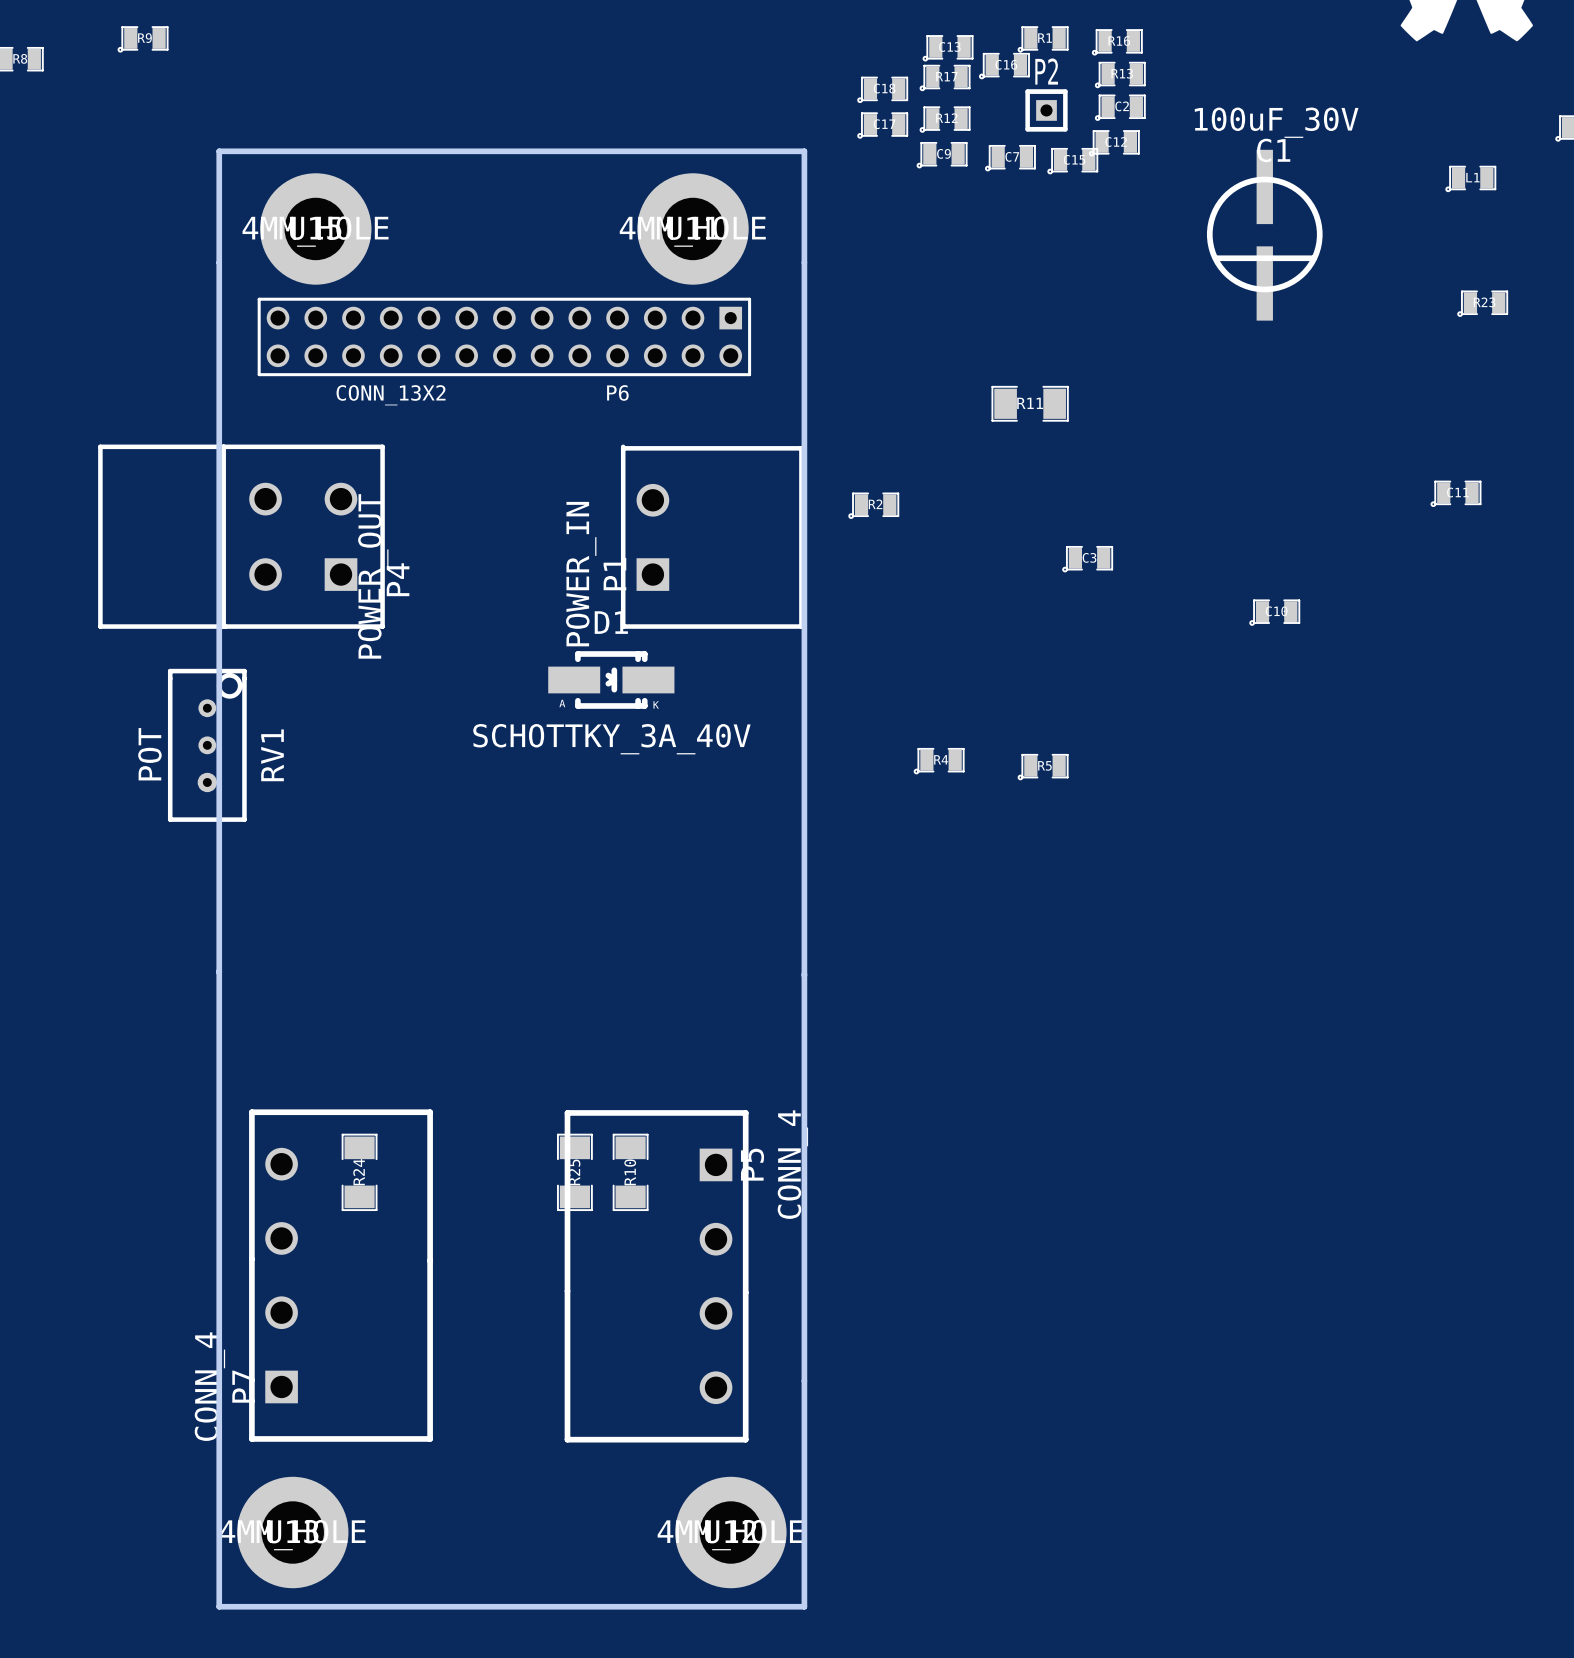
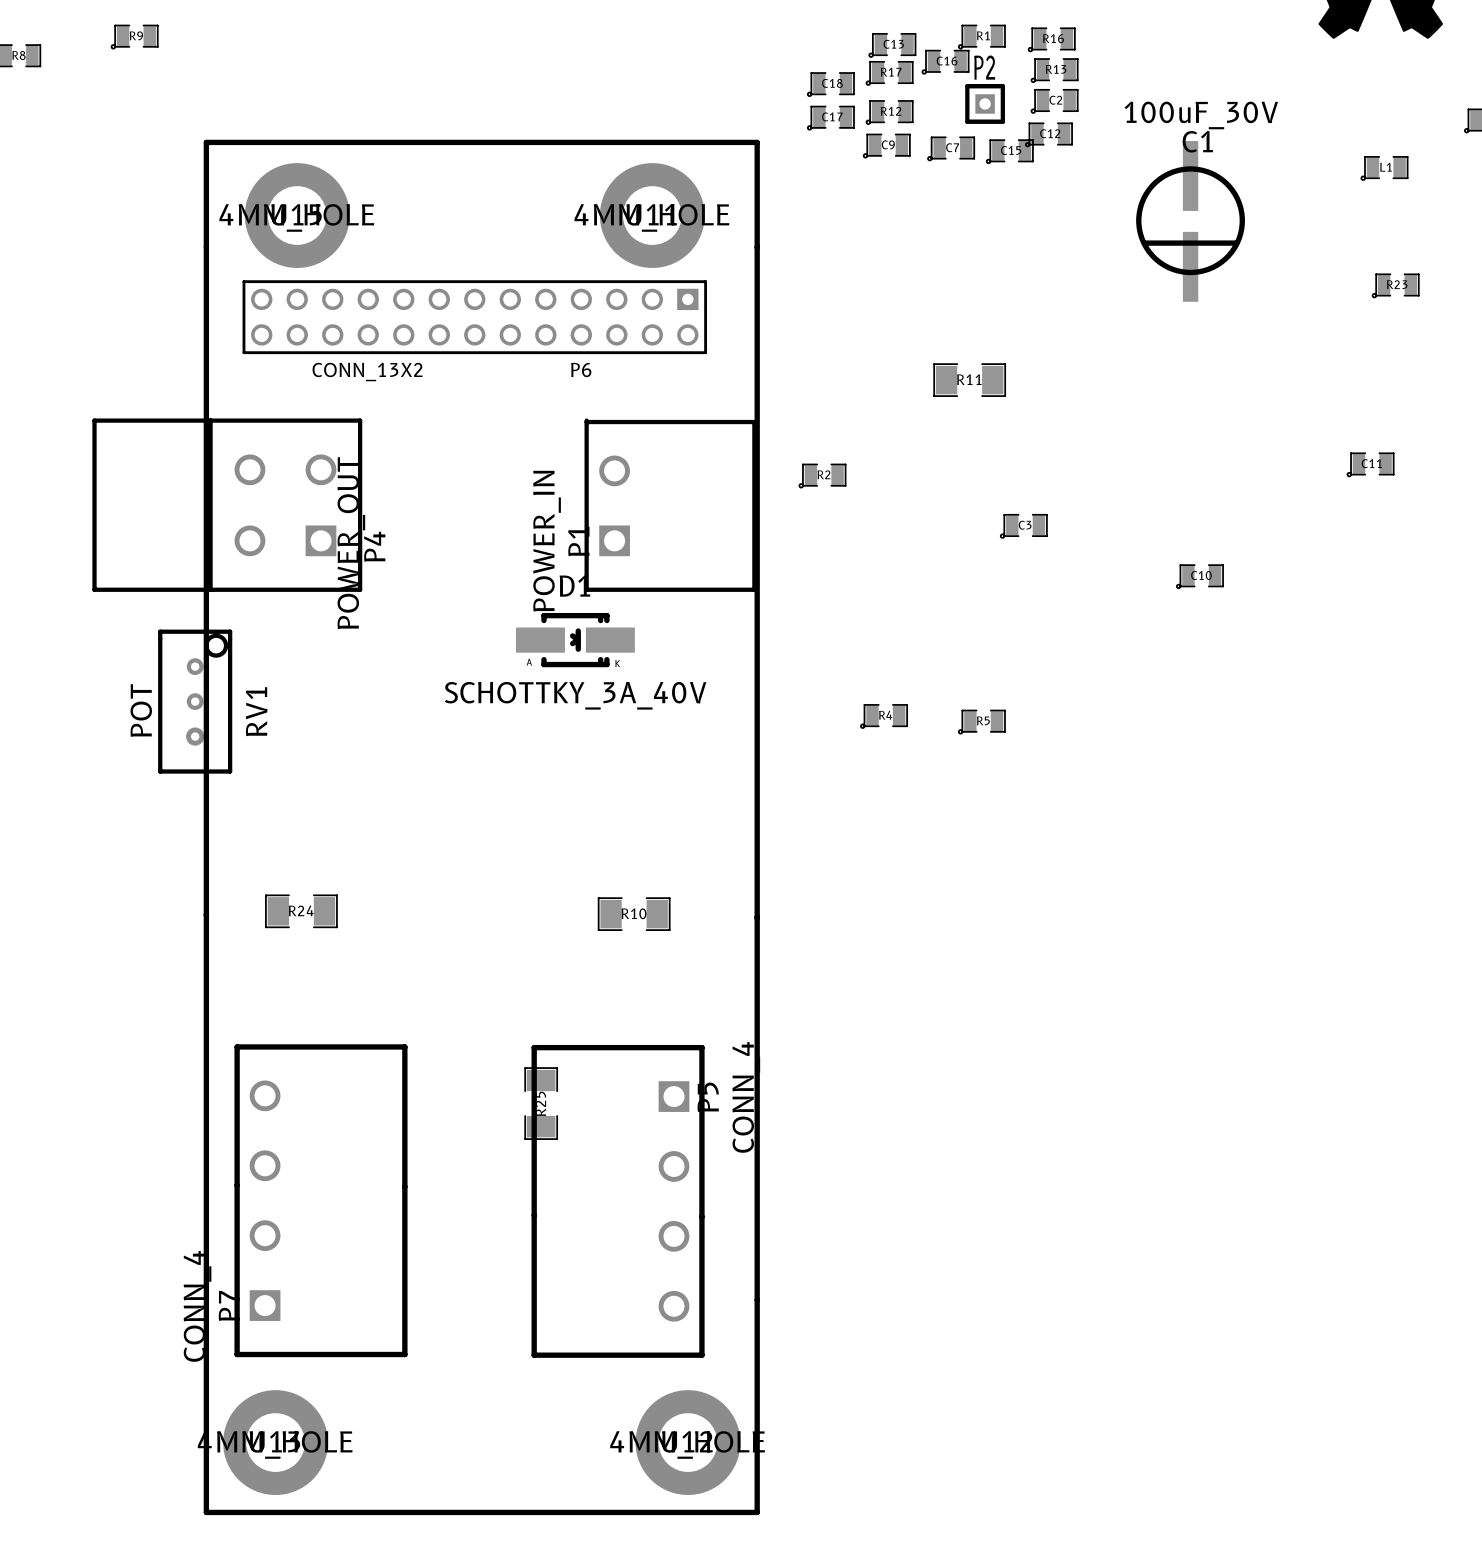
R24 rotation: 0° (359, 1172) -> 90° clockwise (301, 911)
R24 position: (359, 1172) -> (301, 911)
R10 rotation: 0° (630, 1172) -> 90° clockwise (634, 914)
R10 position: (630, 1172) -> (634, 914)

